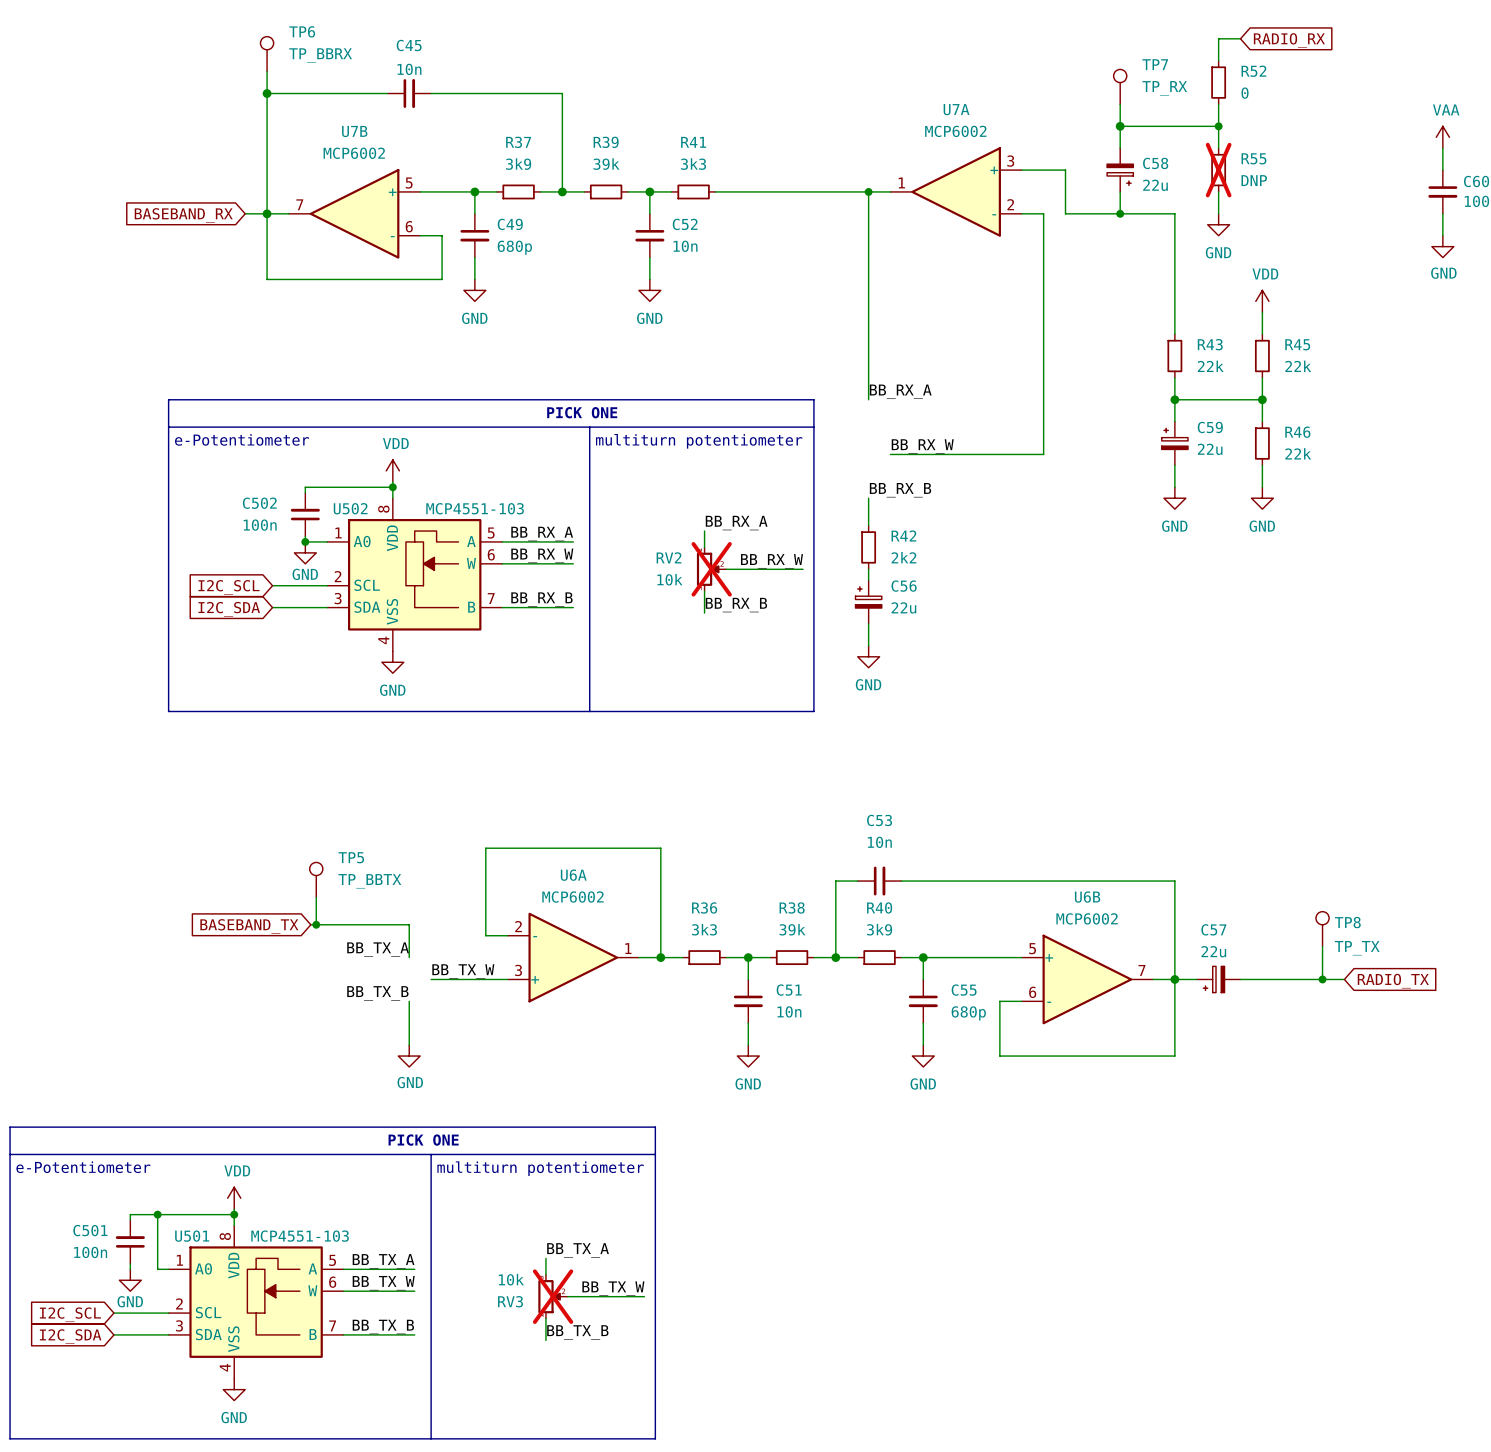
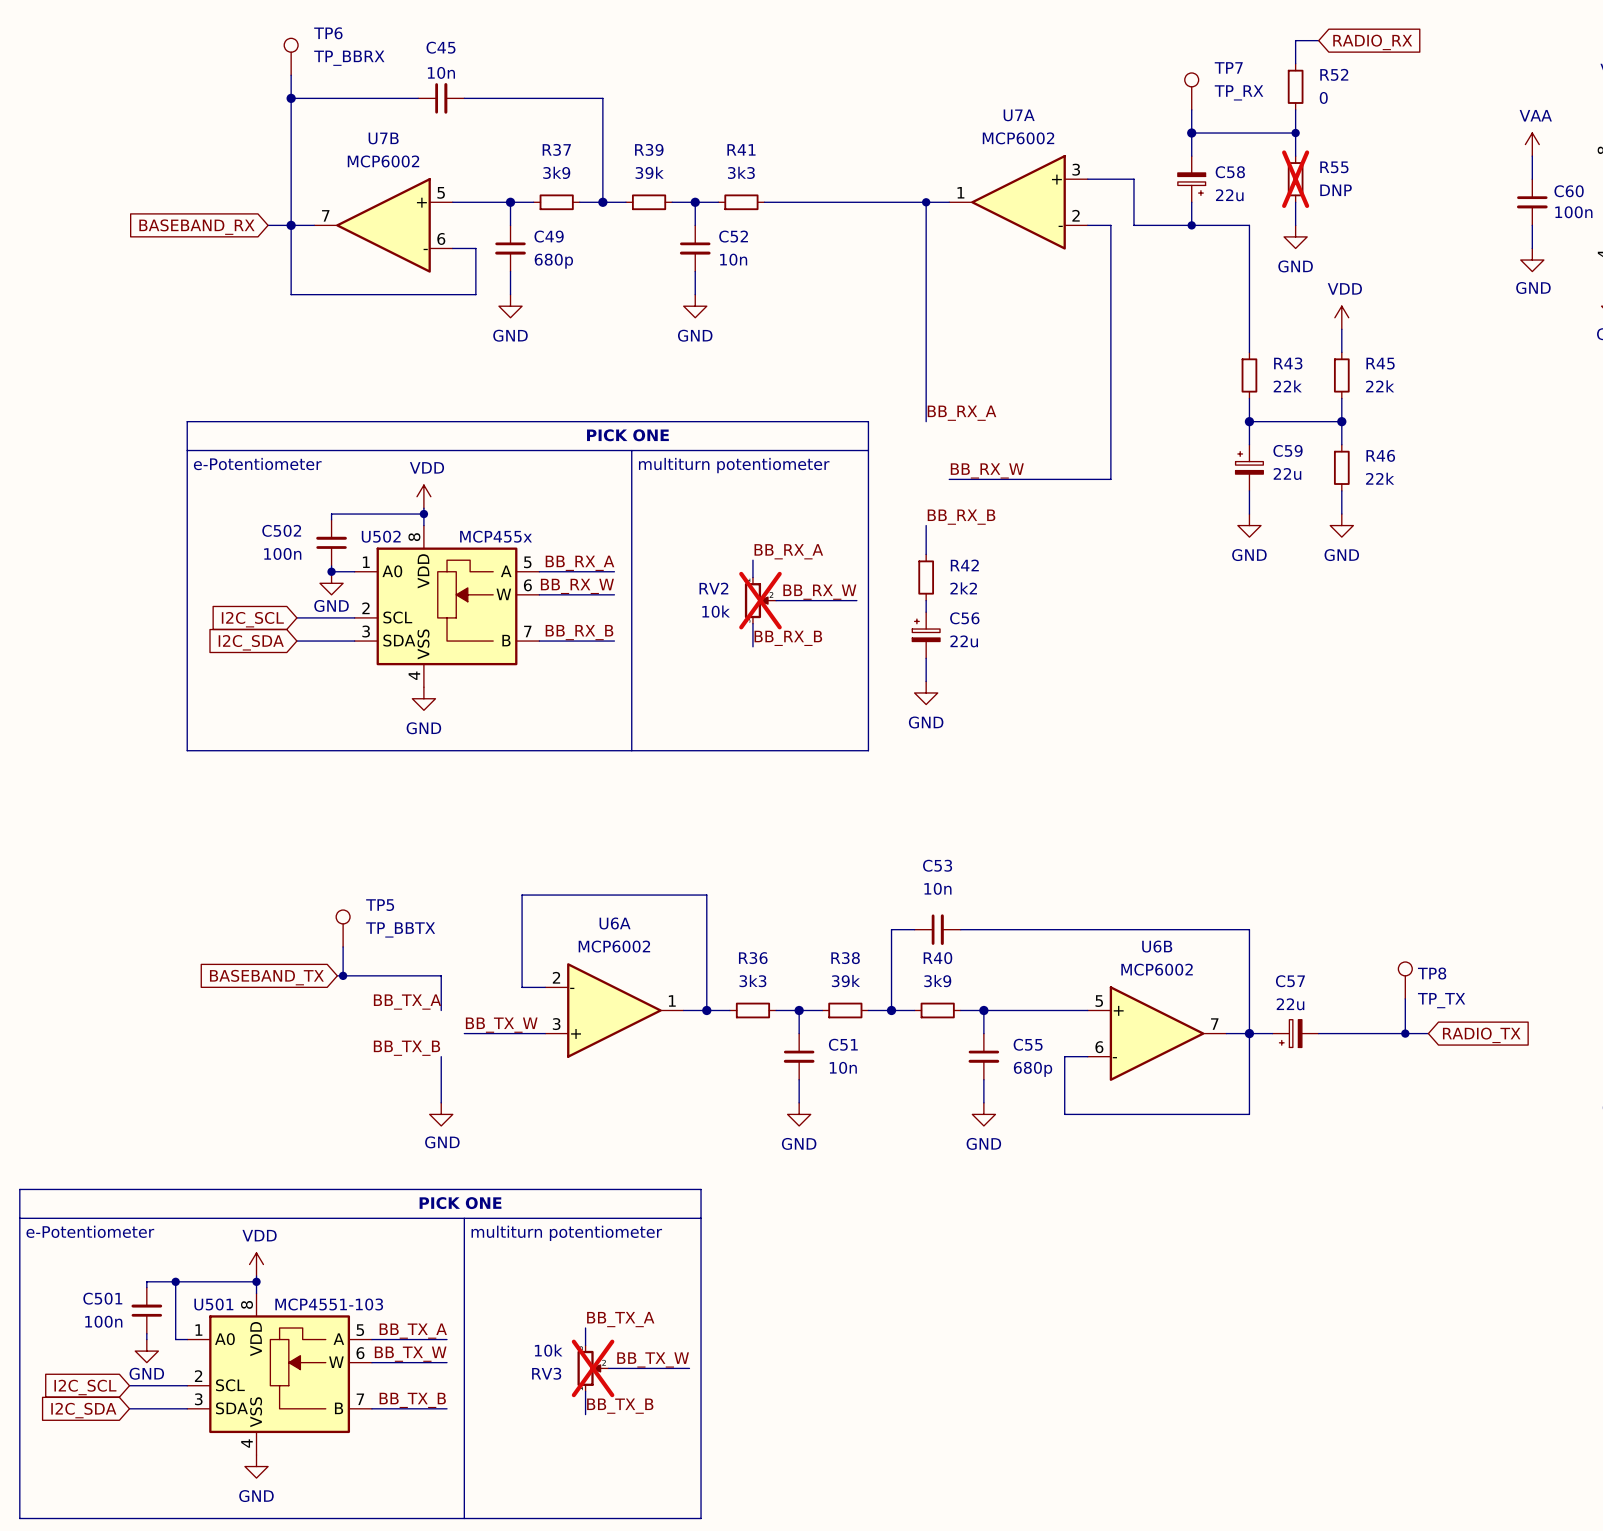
U502 value: MCP4551-103 (475, 508) -> MCP455x (496, 536)

